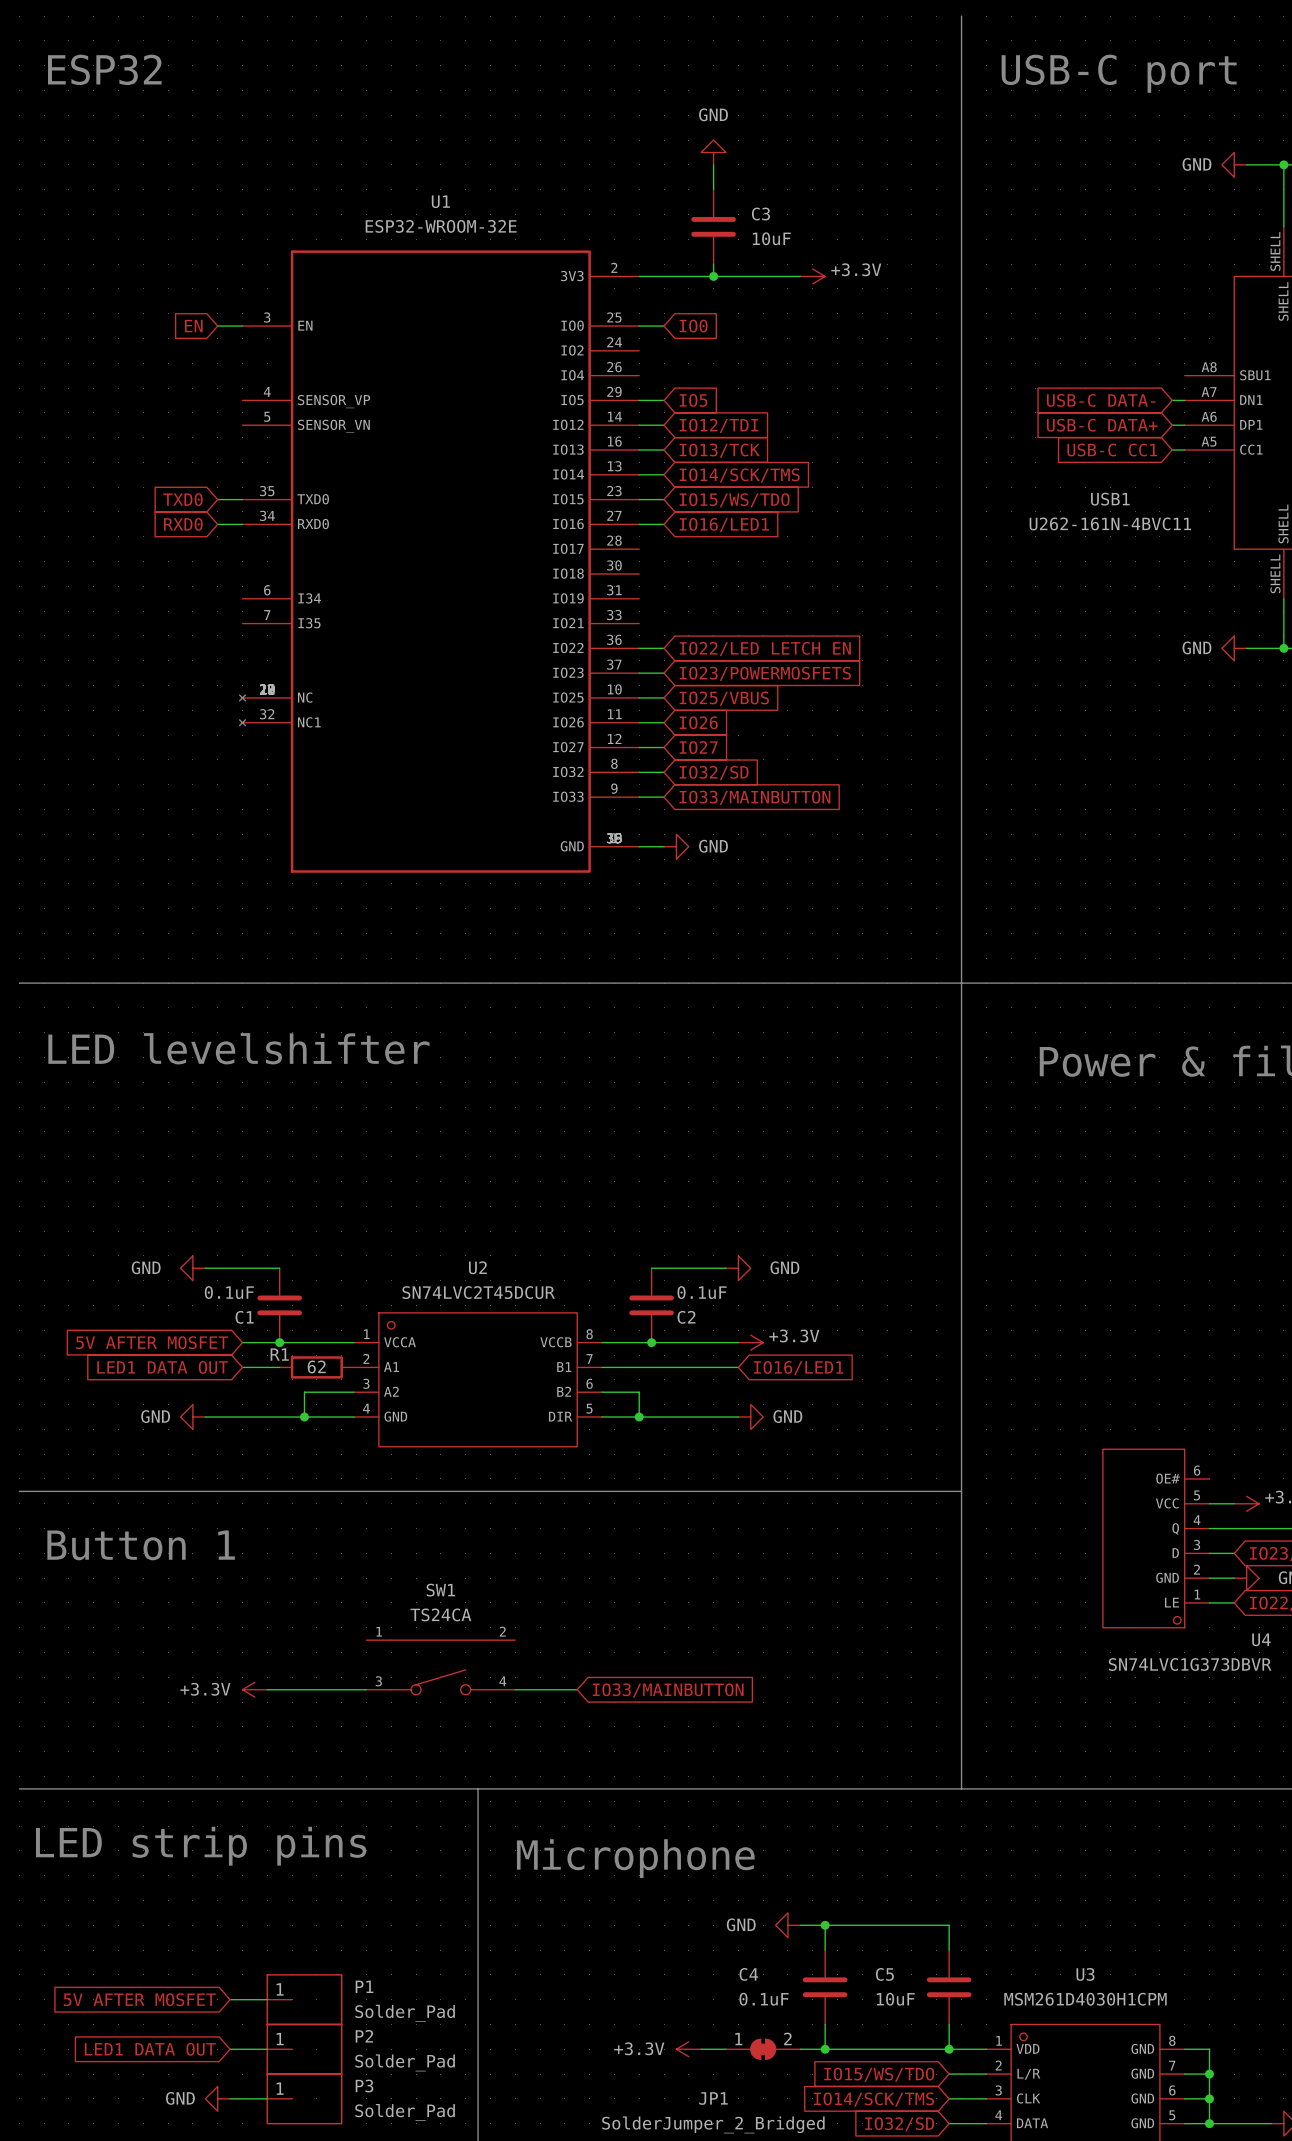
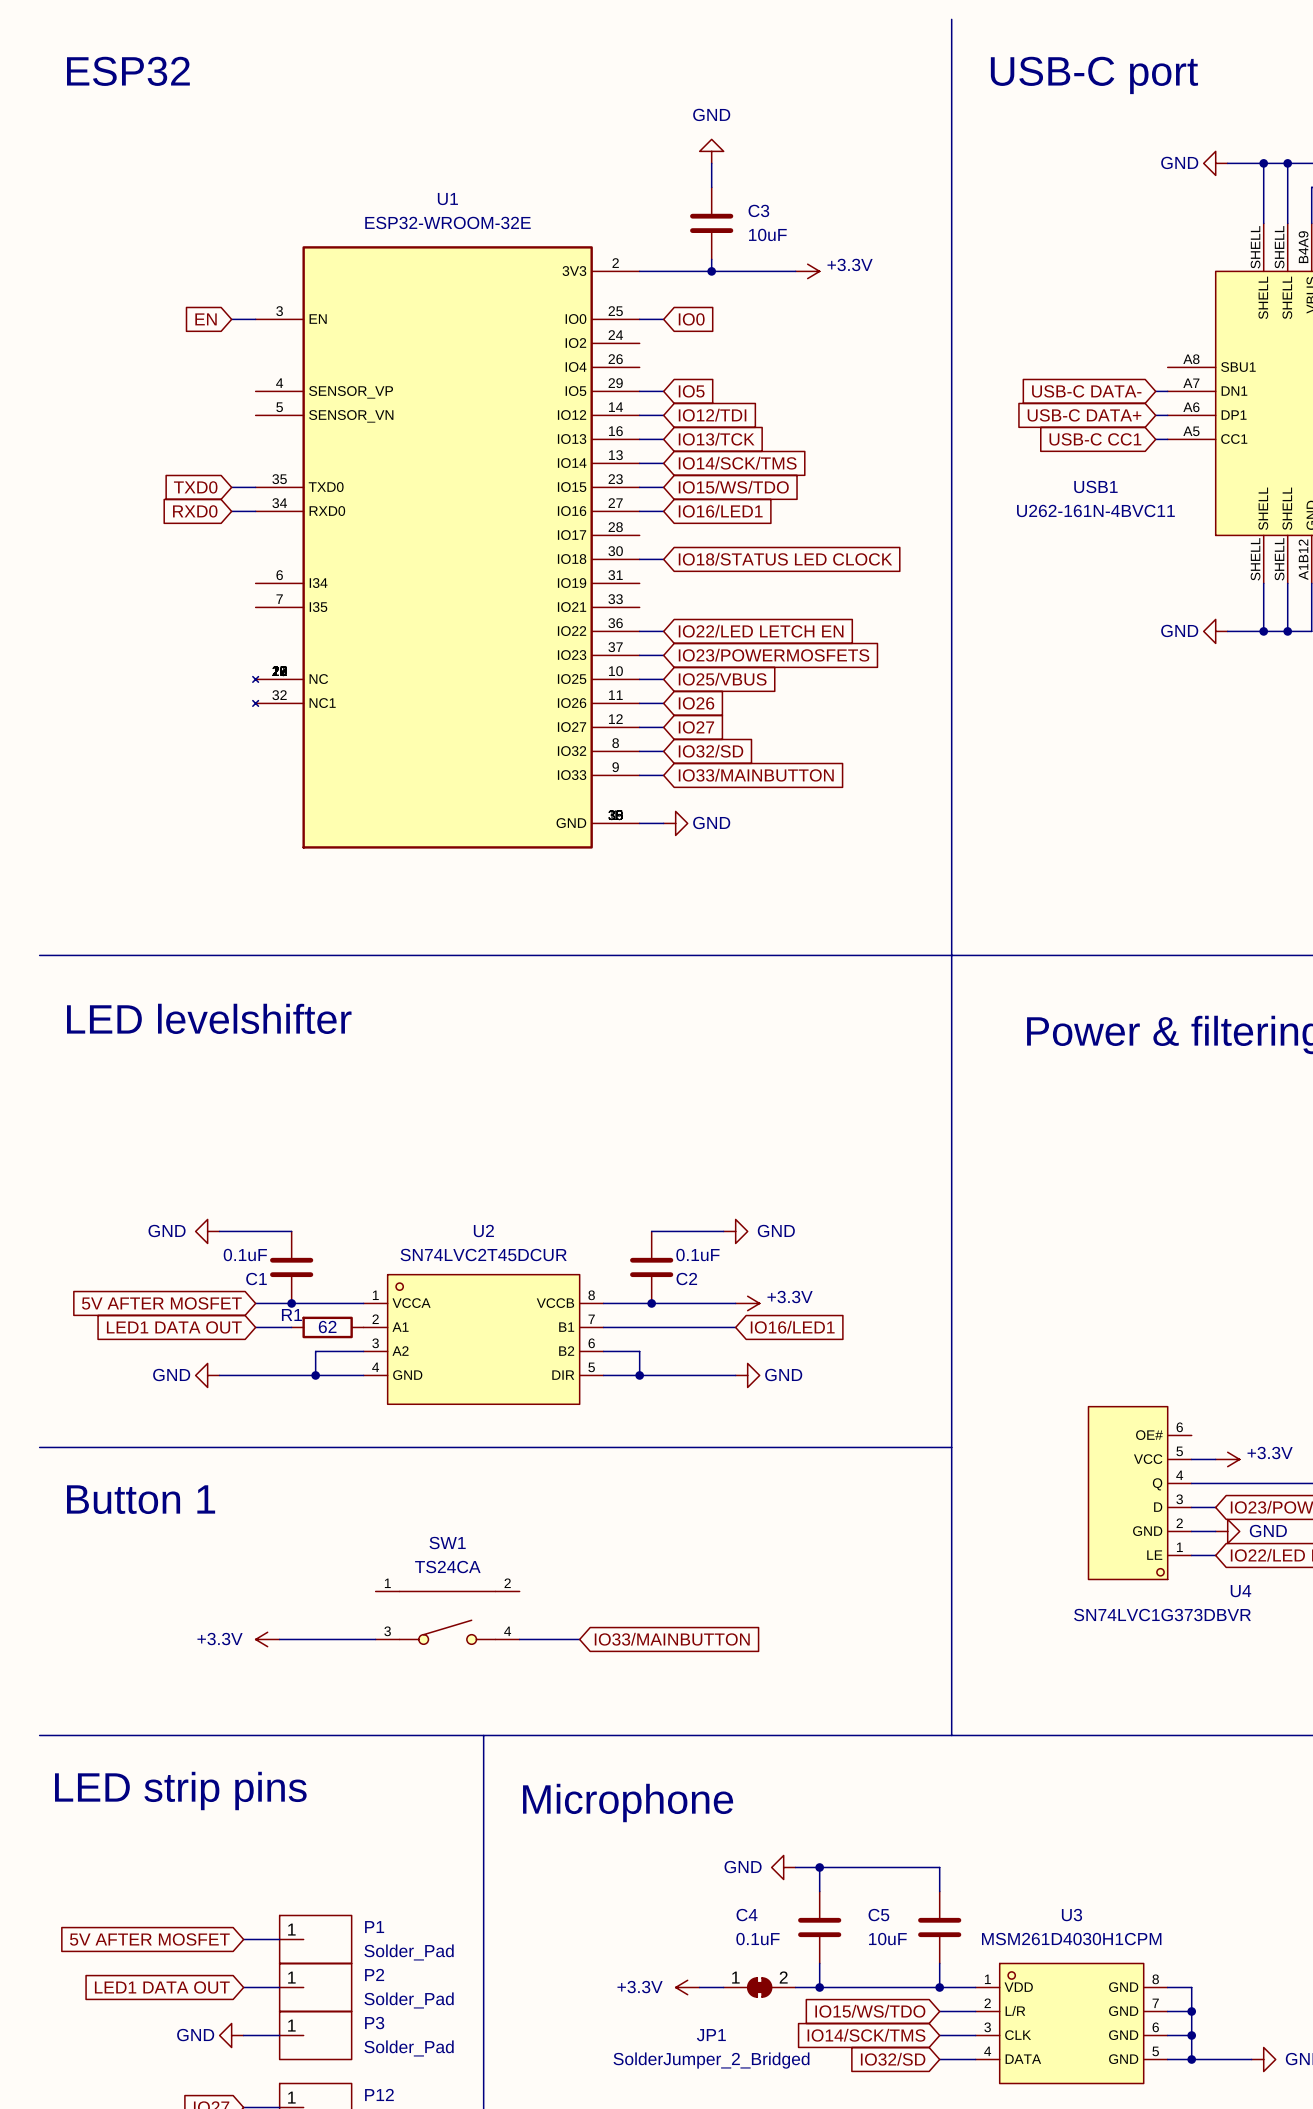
wire: none -> (639, 559) (663, 559)
global label: none -> IO18/STATUS LED CLOCK (785, 559)

